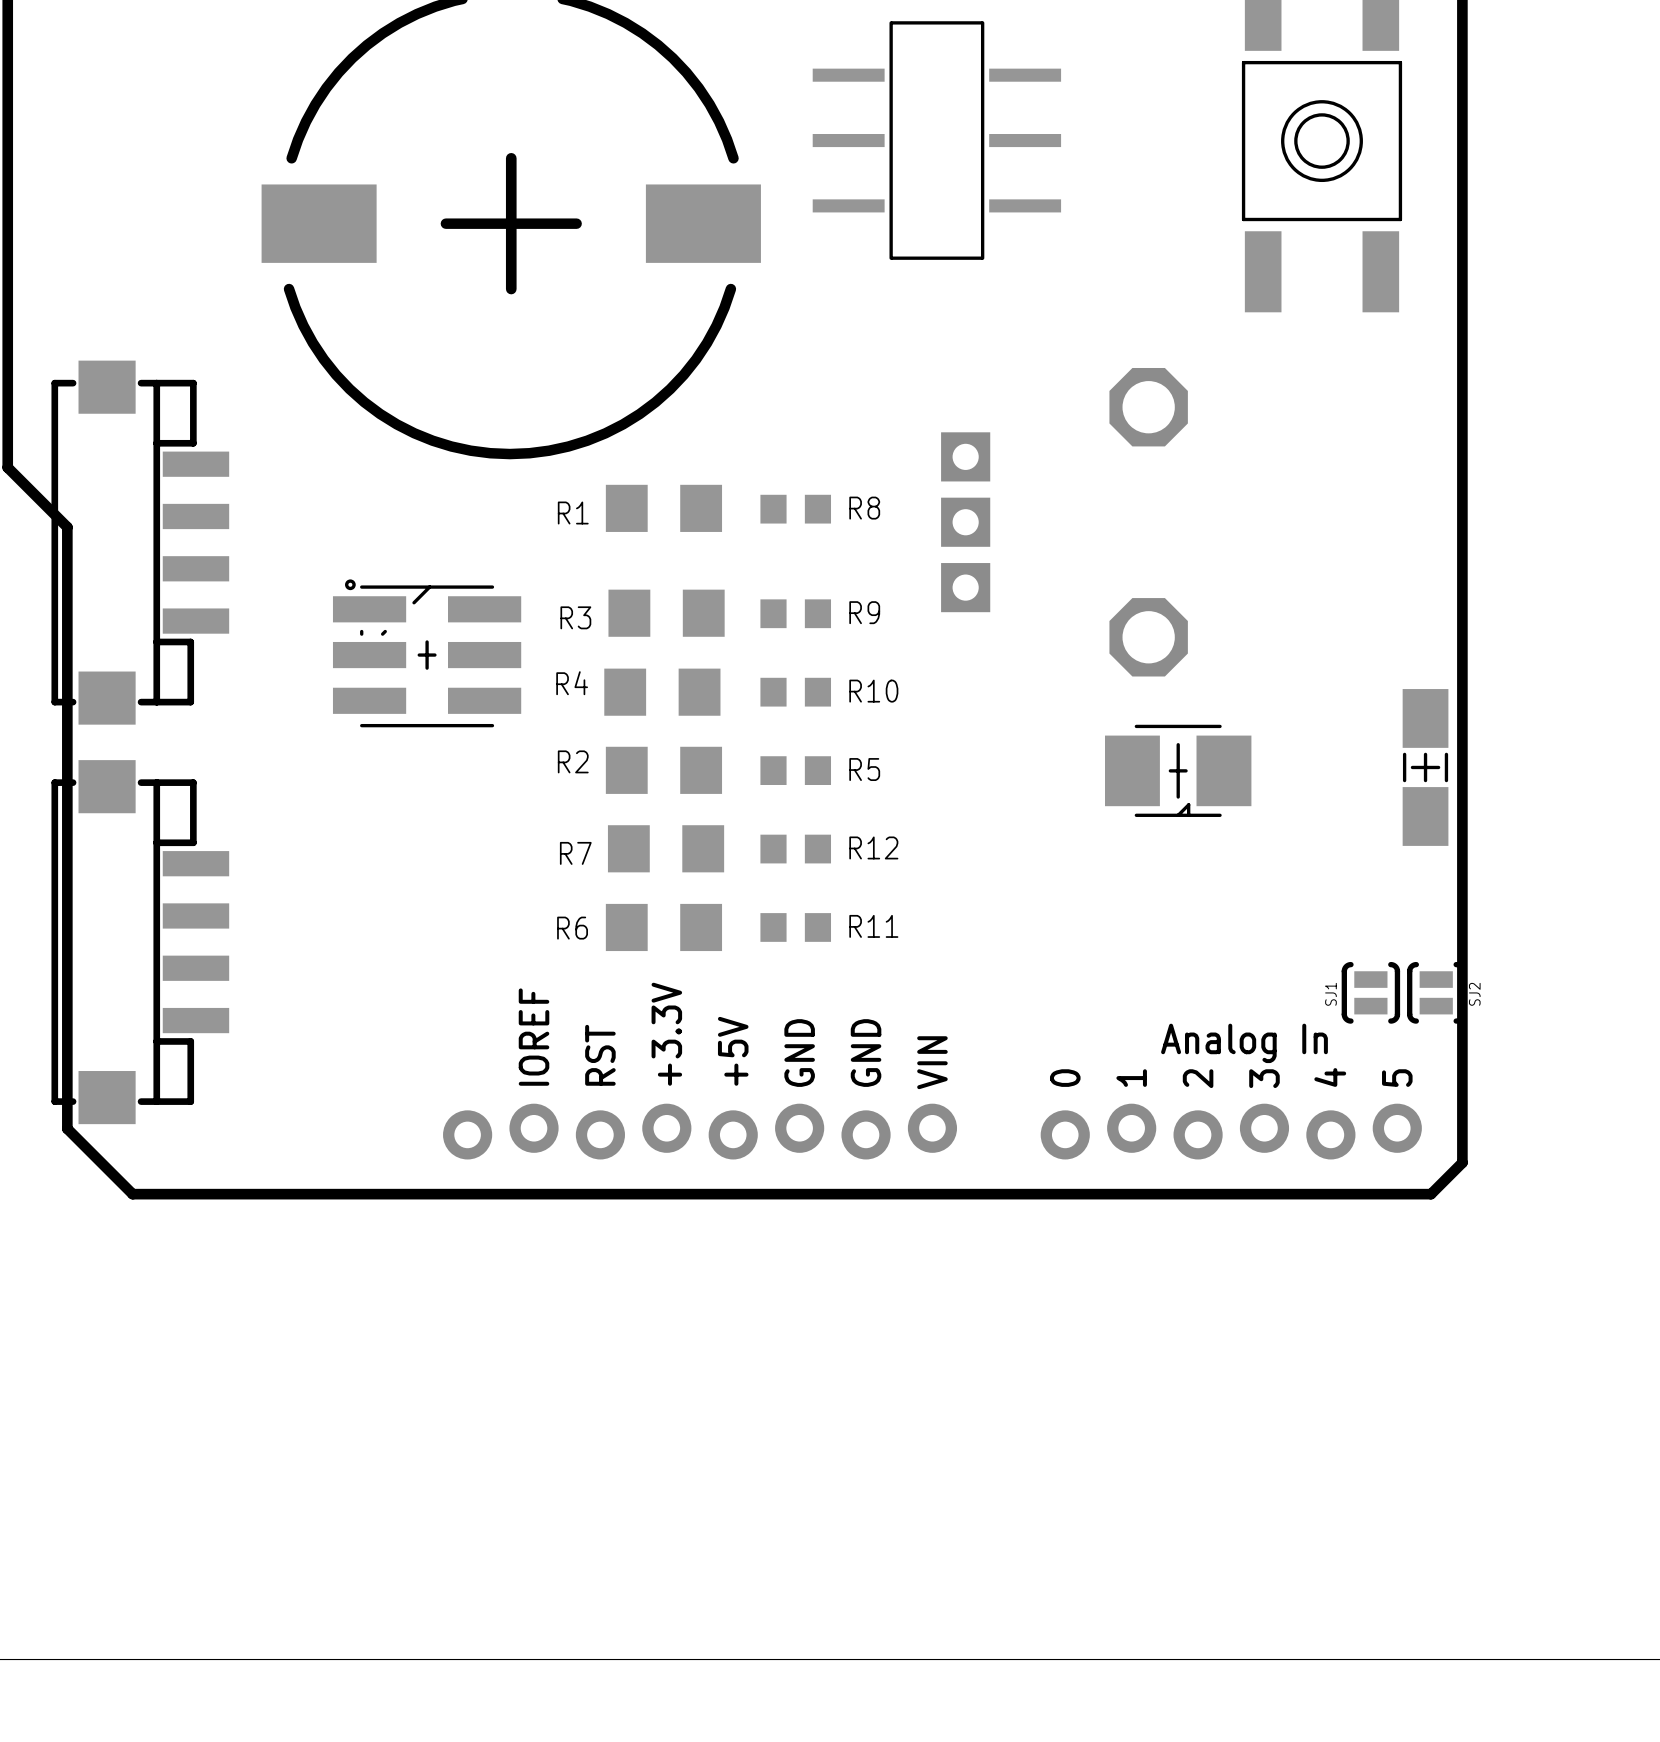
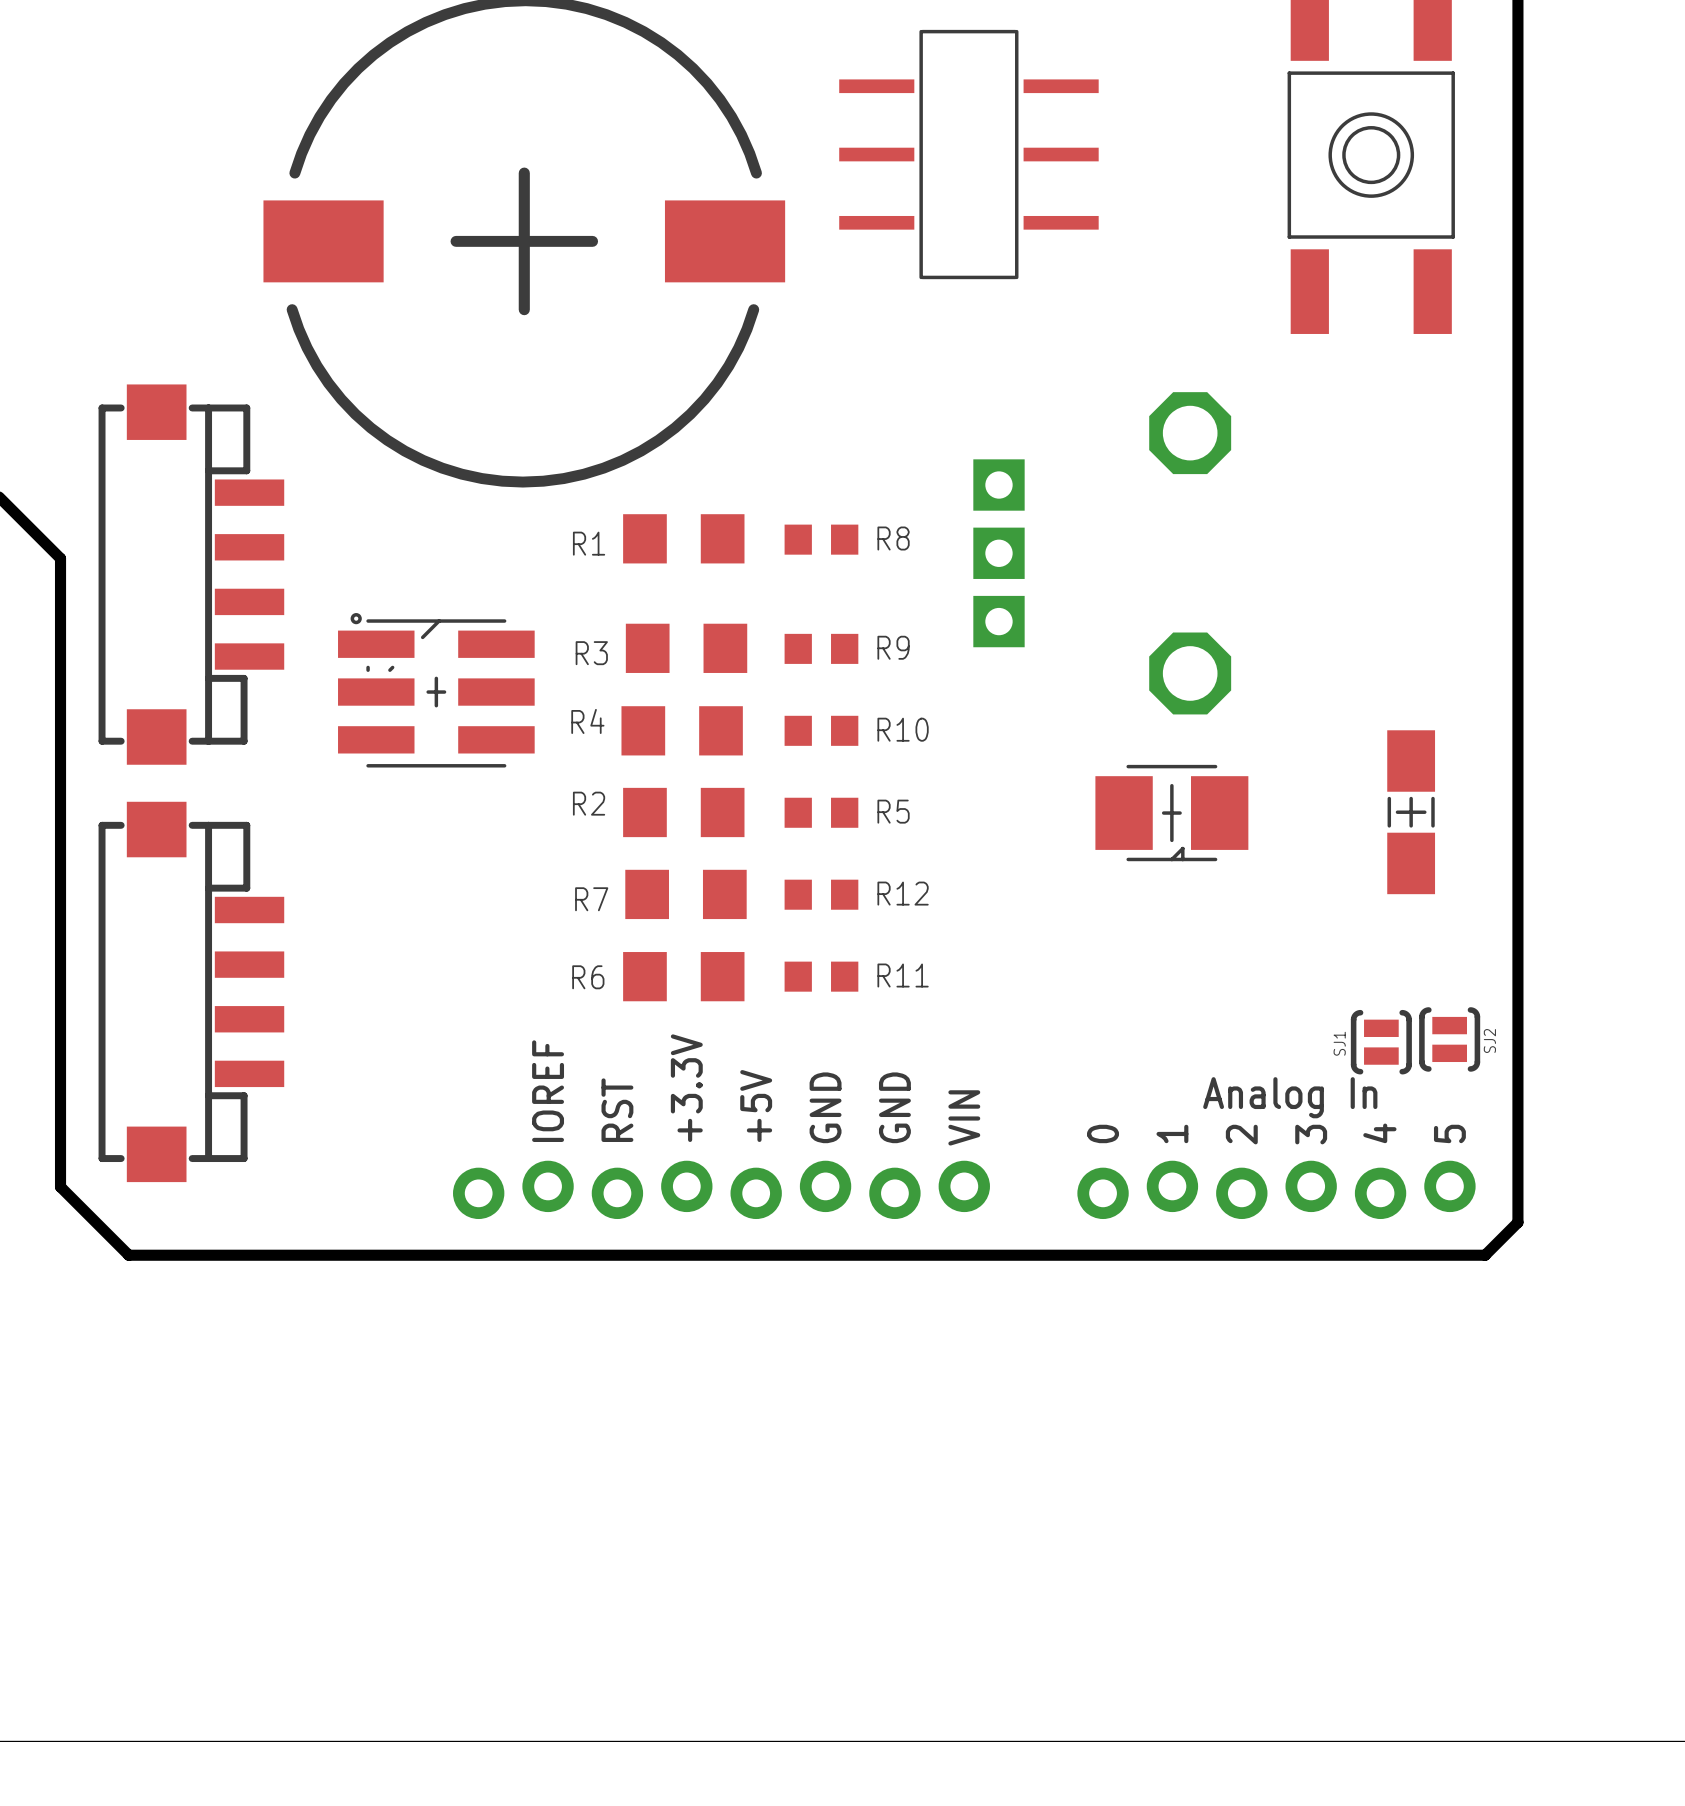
part position: (140, 542) -> (191, 574)
part position: (1425, 767) -> (1411, 812)
part position: (1178, 770) -> (1171, 813)
part position: (140, 942) -> (191, 991)
SJ1 position: (1370, 992) -> (1381, 1042)
SJ2 position: (1436, 992) -> (1449, 1039)

